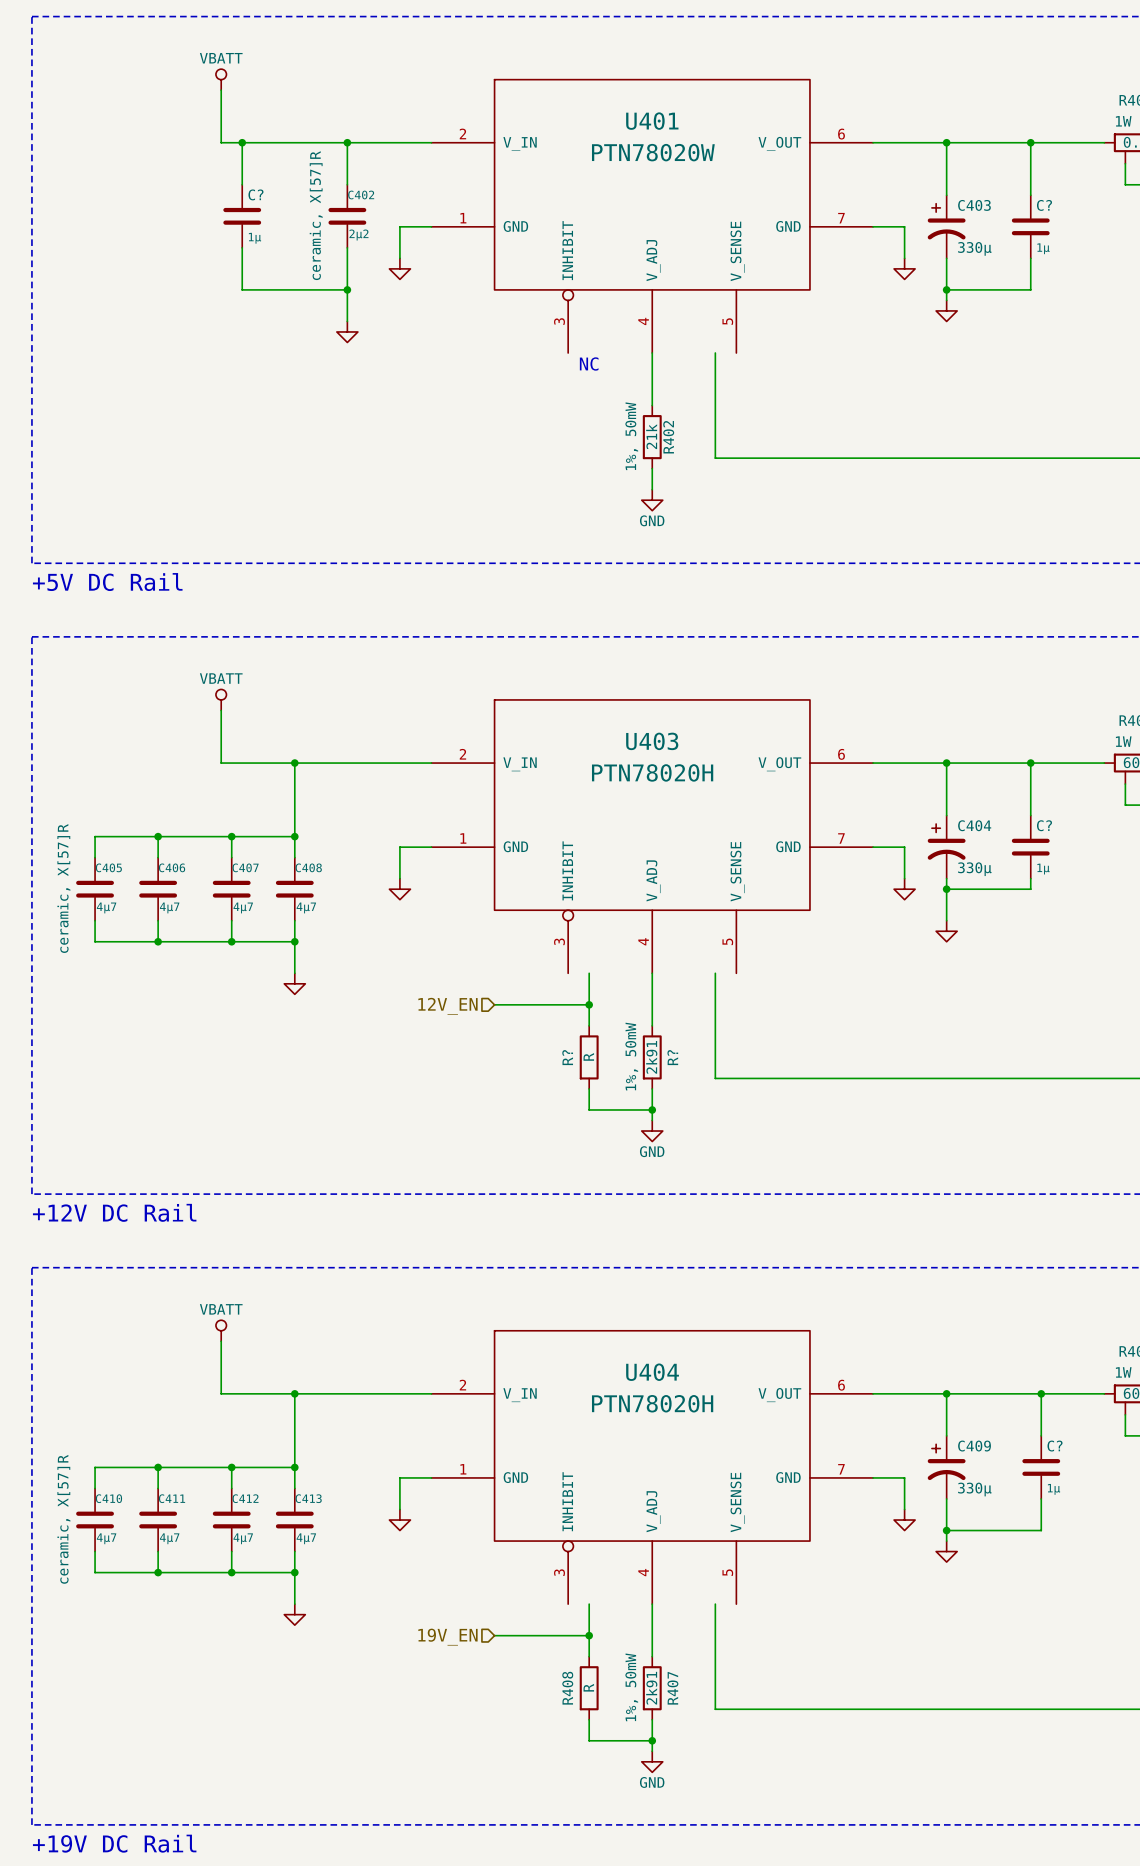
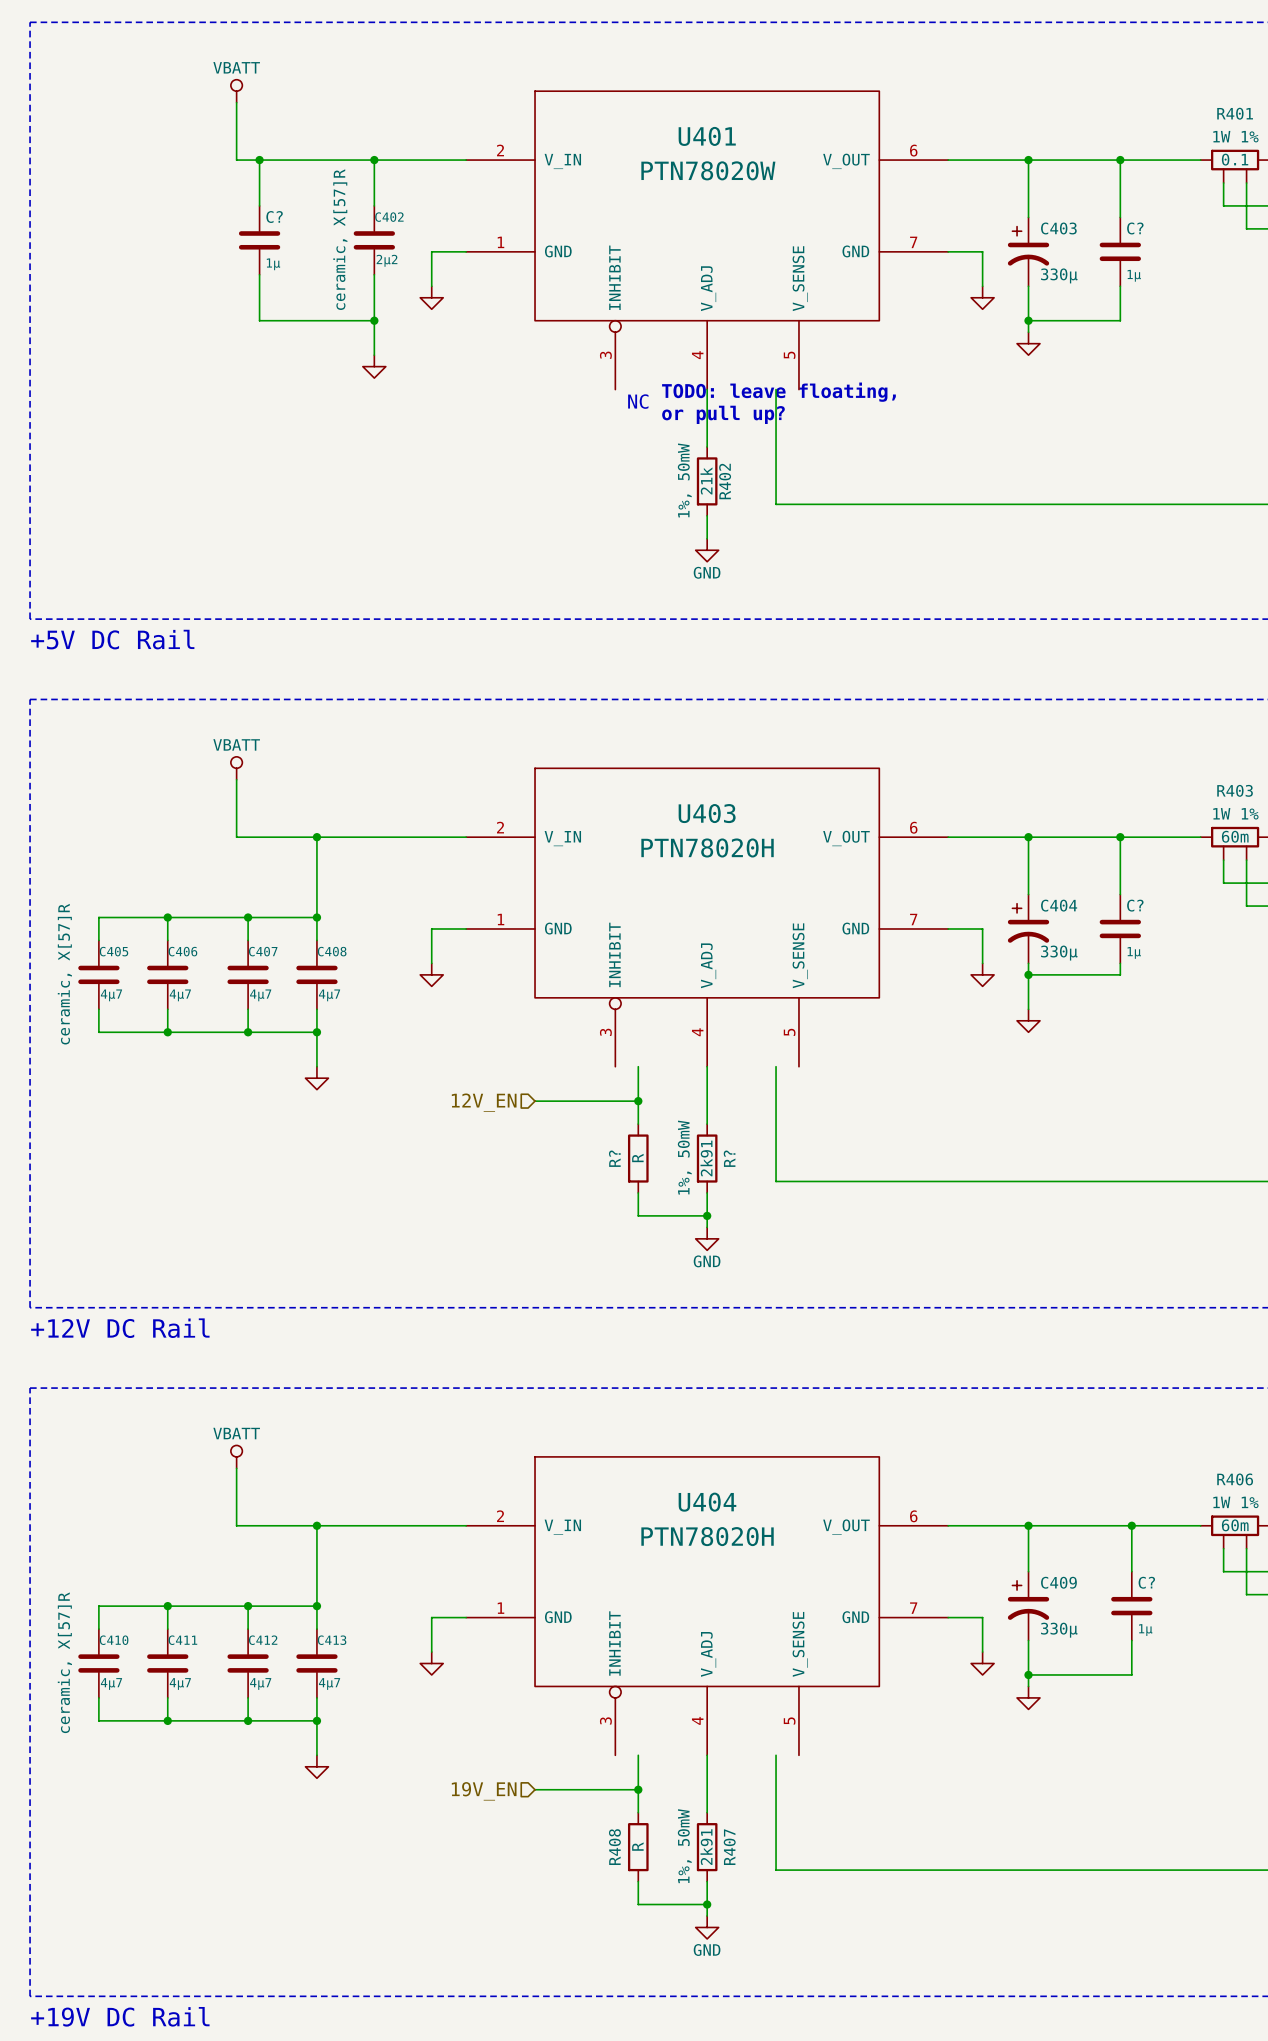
text: none -> TODO: leave floating, (778, 392)
text: none -> or pull up? (723, 414)

